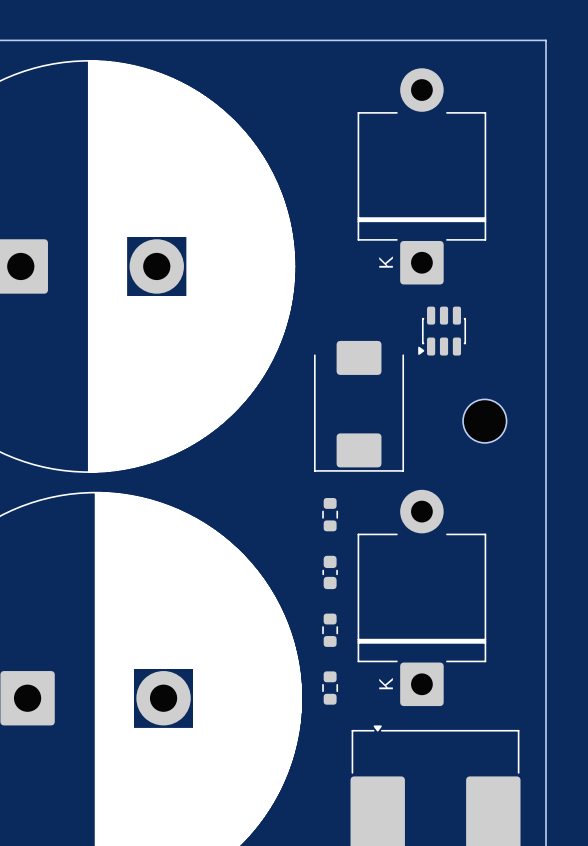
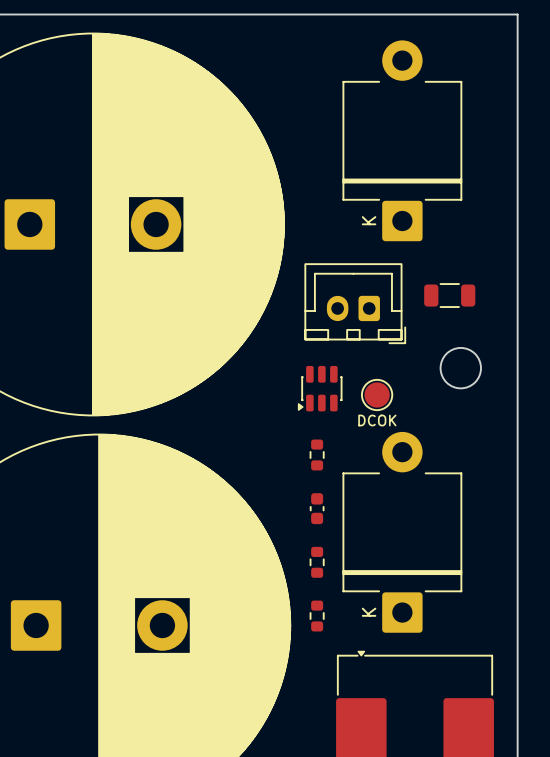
part position: (442, 331) -> (320, 388)
part: none -> (449, 295)
part: none -> (355, 303)
part: (359, 406) -> none
part: none -> DCOK (377, 394)

